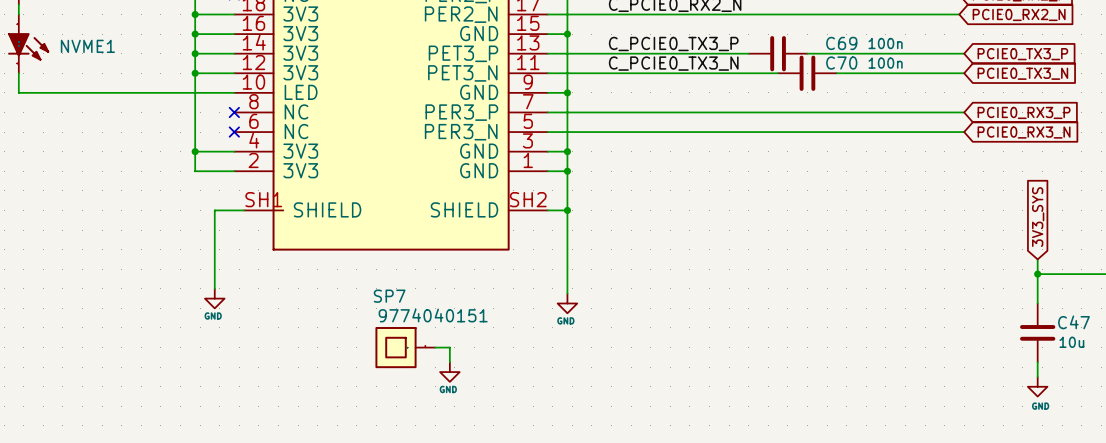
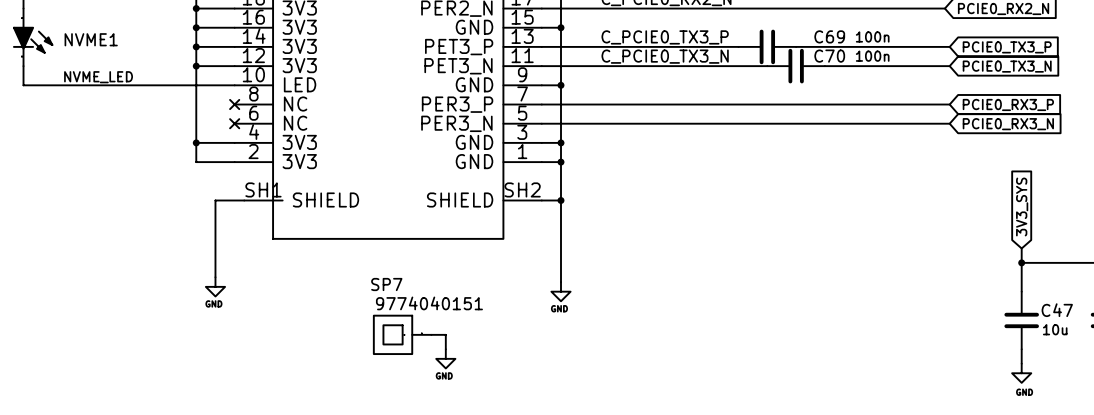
label: none -> NVME_LED (98, 77)

